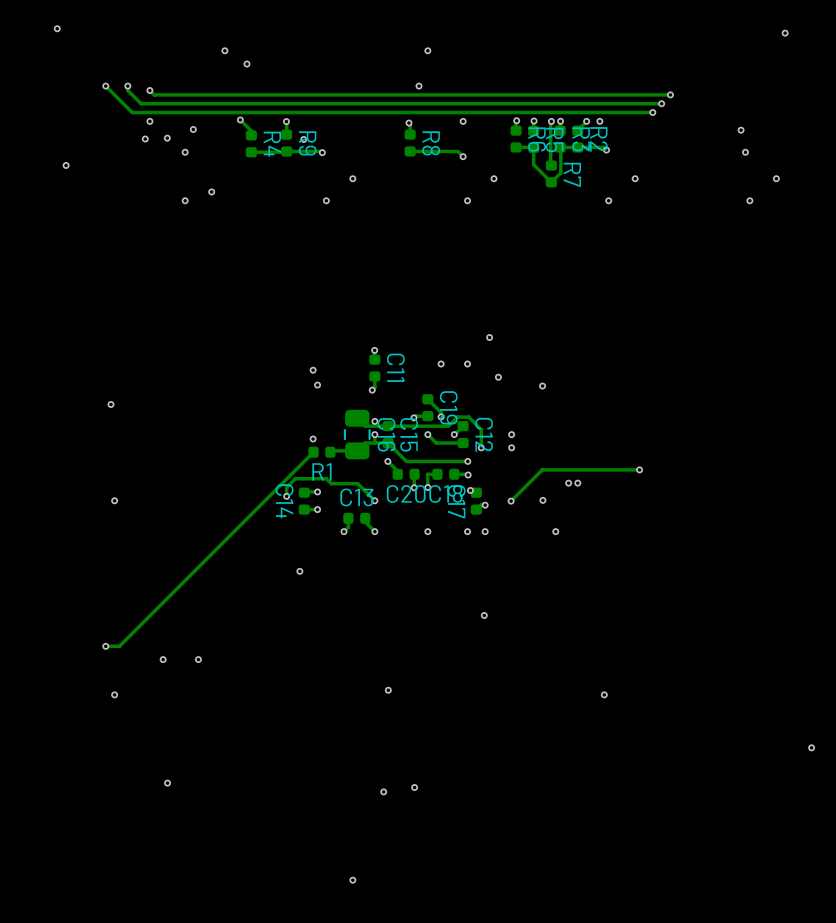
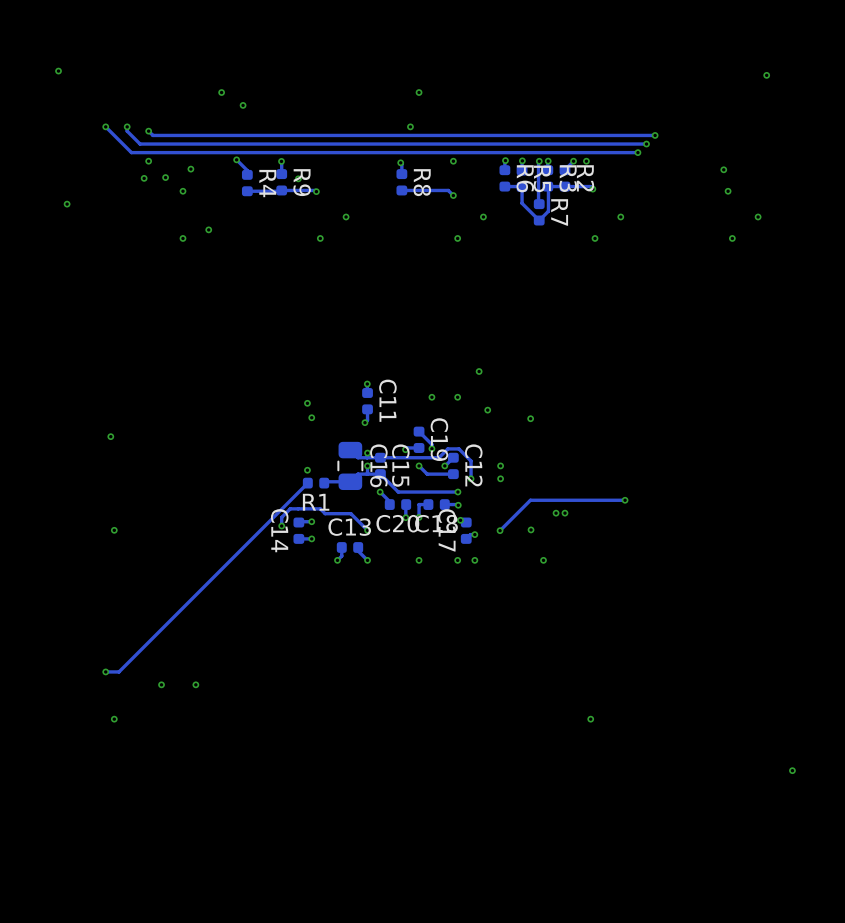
via: (299, 571) -> none
via: (484, 615) -> none
via: (388, 690) -> none
via: (167, 783) -> none
via: (414, 787) -> none
via: (383, 791) -> none
via: (352, 880) -> none

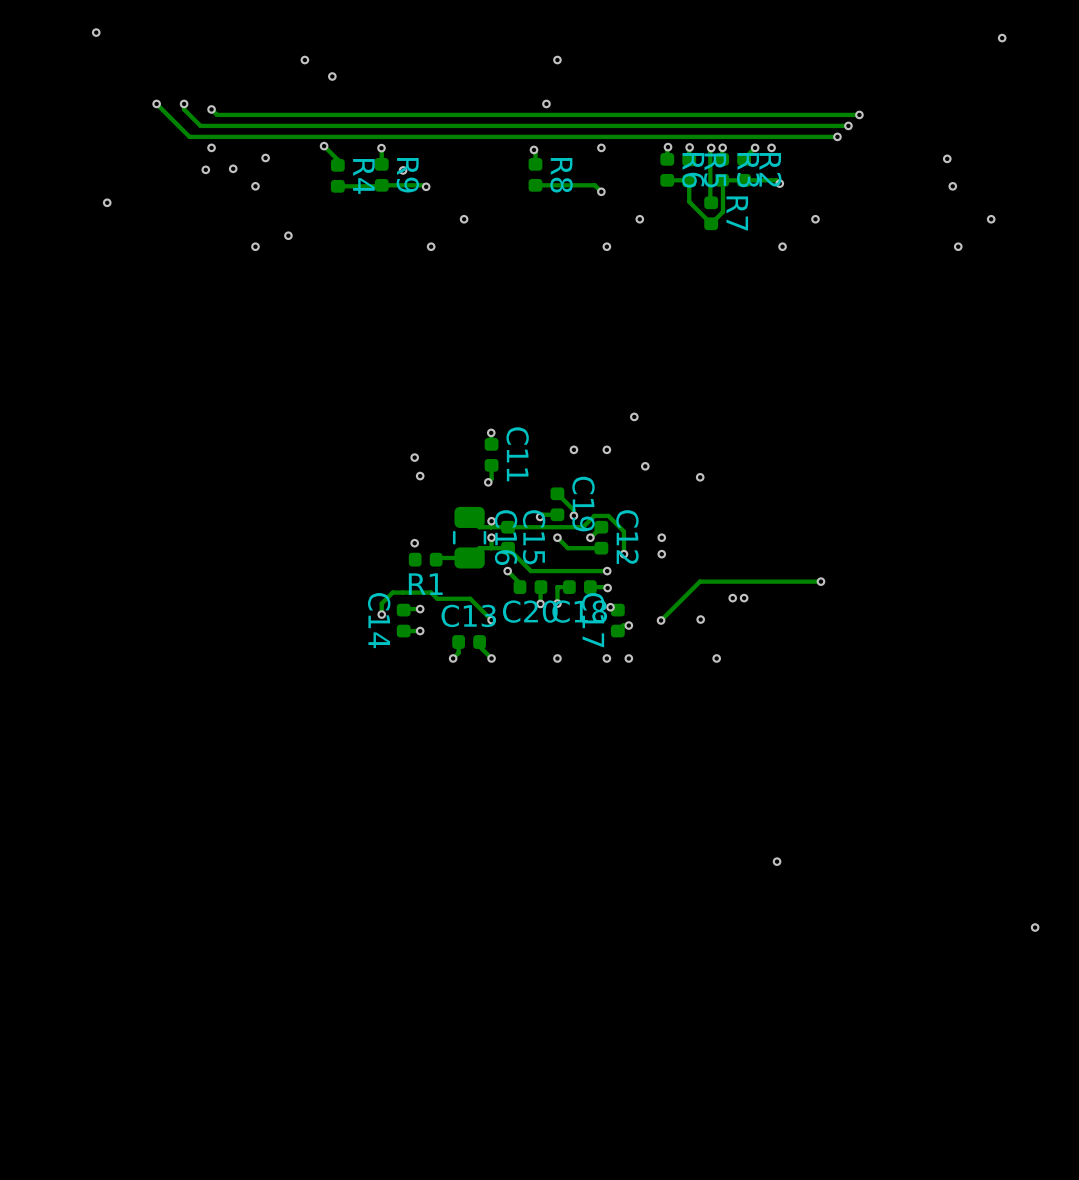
via: (110, 436) -> none
track: (307, 483) (118, 671) (105, 671) -> none
via: (114, 530) -> none
via: (105, 671) -> none
via: (161, 684) -> none
via: (195, 684) -> none
via: (114, 719) -> none

